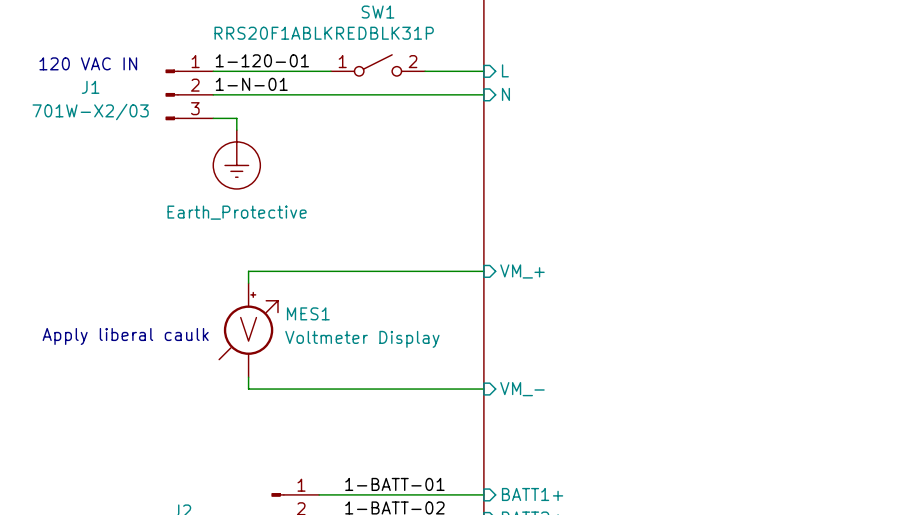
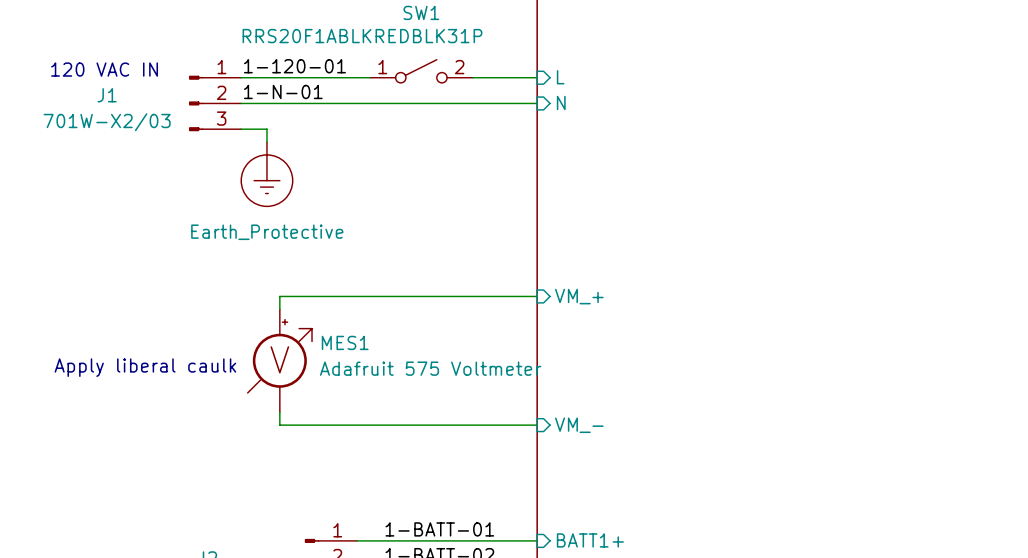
MES1 value: Voltmeter Display (362, 339) -> Adafruit 575 Voltmeter (430, 368)

